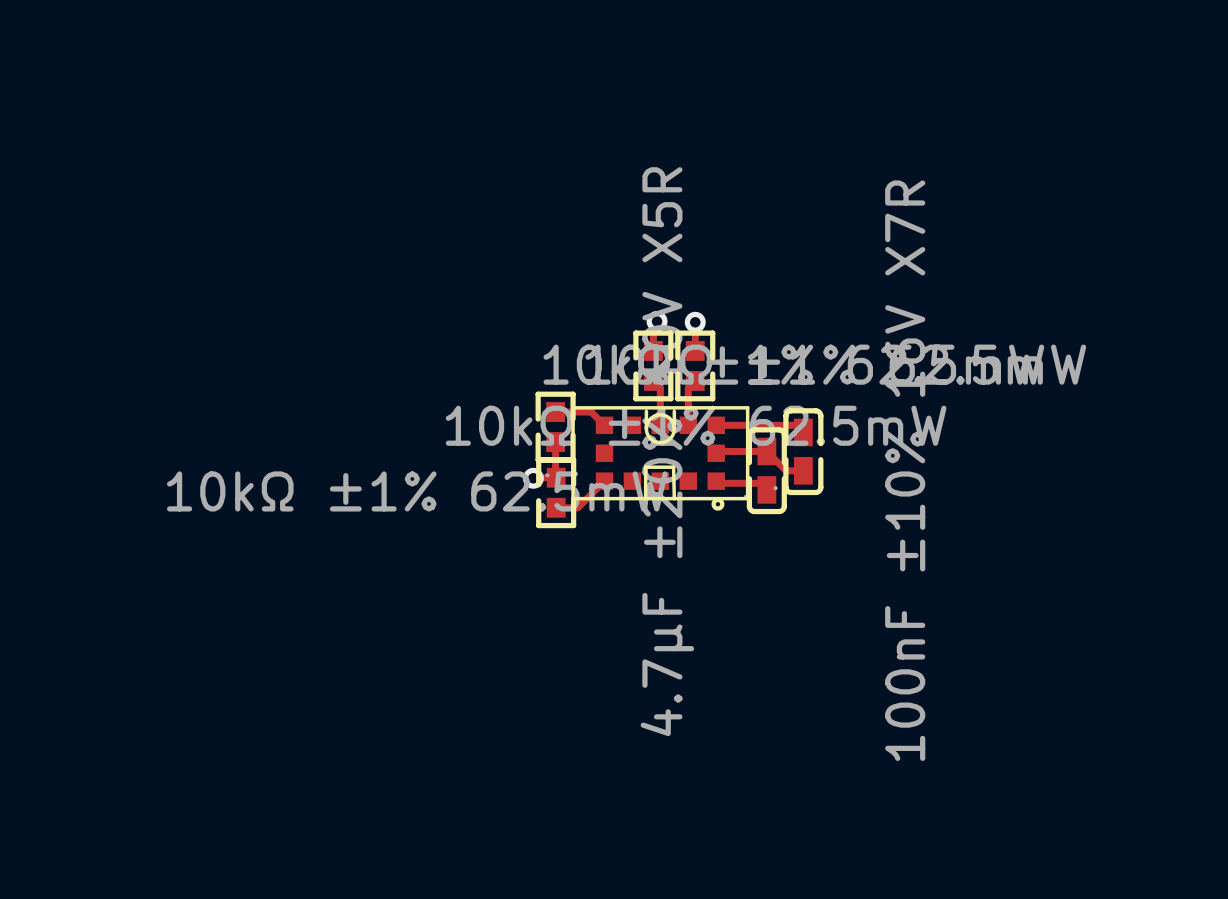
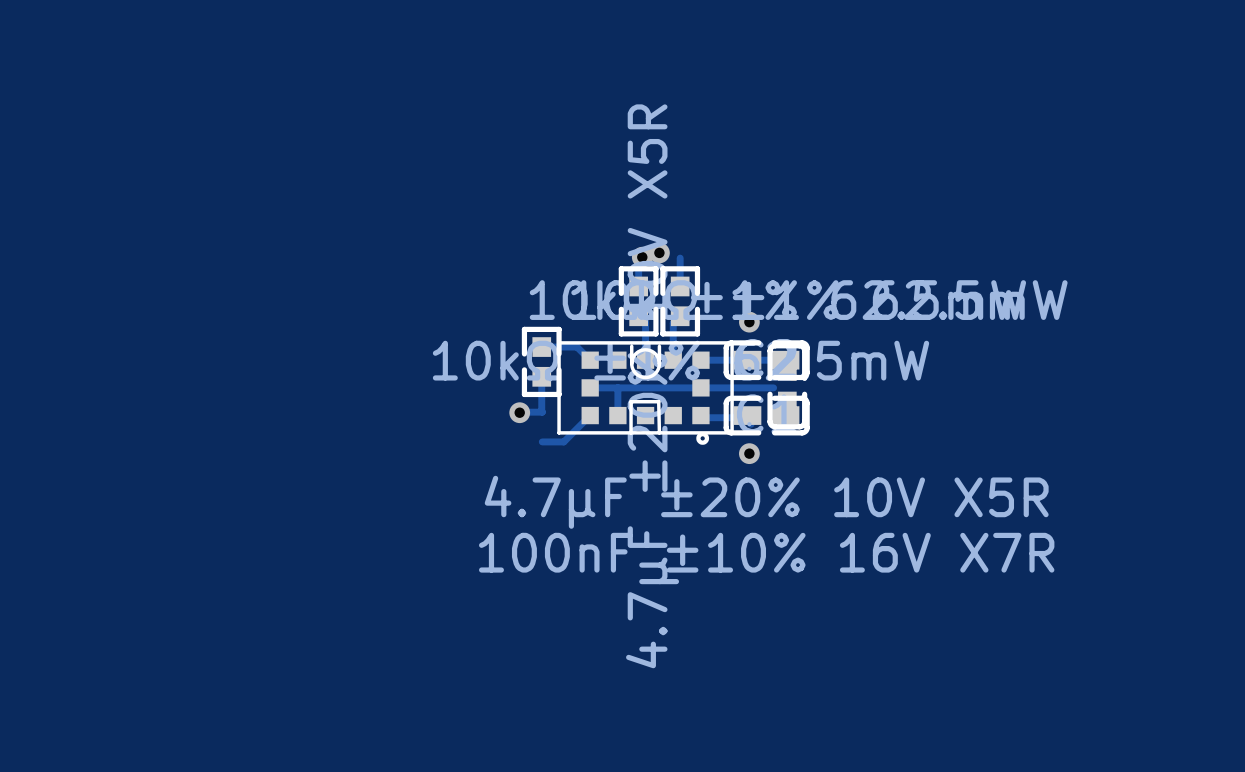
via position: (695, 322) -> (659, 252)
via: none -> (749, 322)
part: none -> 4.7µF ±20% 10V X5R (766, 360)
track: none -> (590, 387) (773, 387)
track: none -> (617, 387) (617, 415)
track: (716, 453) (717, 451) (766, 451) (786, 470) (803, 470) -> none
part: 100nF ±10% 16V X7R (766, 470) -> none
part: none -> 100nF ±10% 16V X7R (766, 415)
part: 10kΩ ±1% 62.5mW (556, 492) -> none
via: none -> (749, 453)

